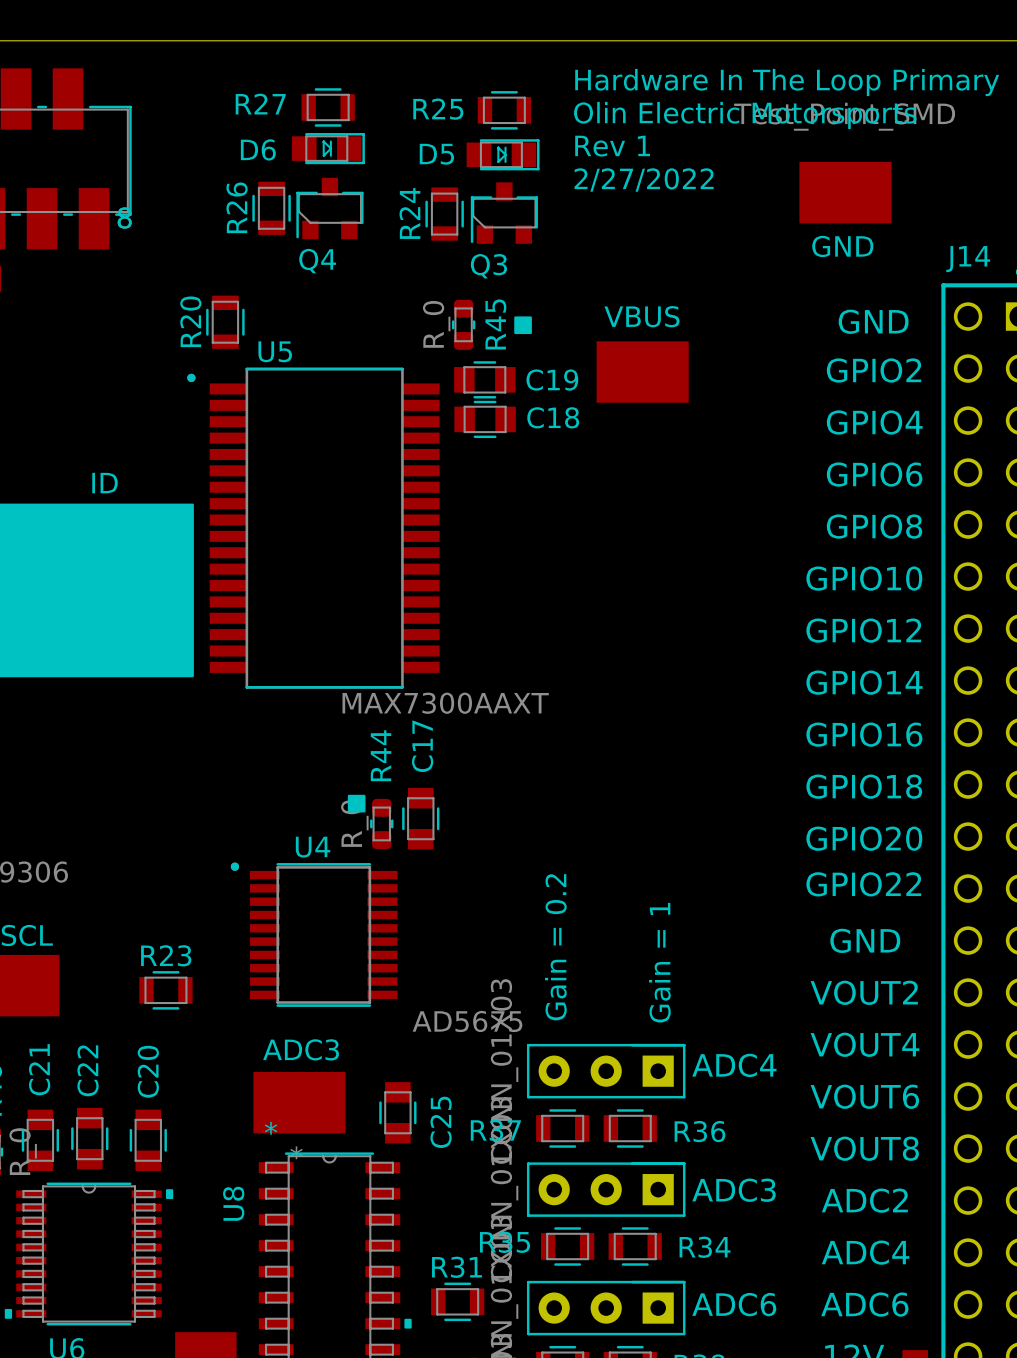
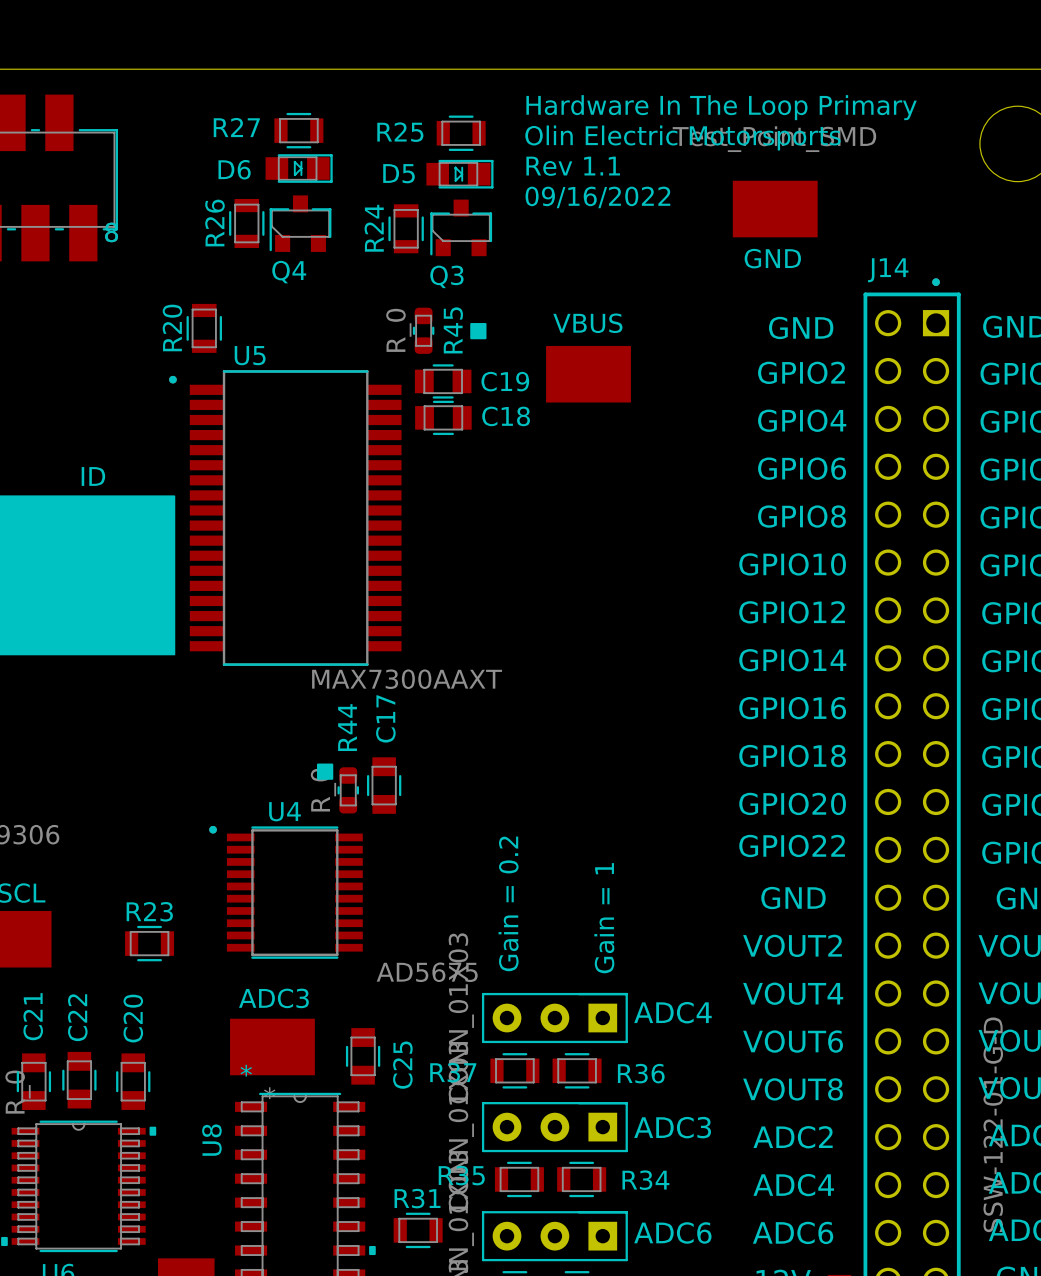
text: Rev 1 (612, 146) -> Rev 1.1 (573, 166)
text: 2/27/2022 (644, 180) -> 09/16/2022 (597, 197)

